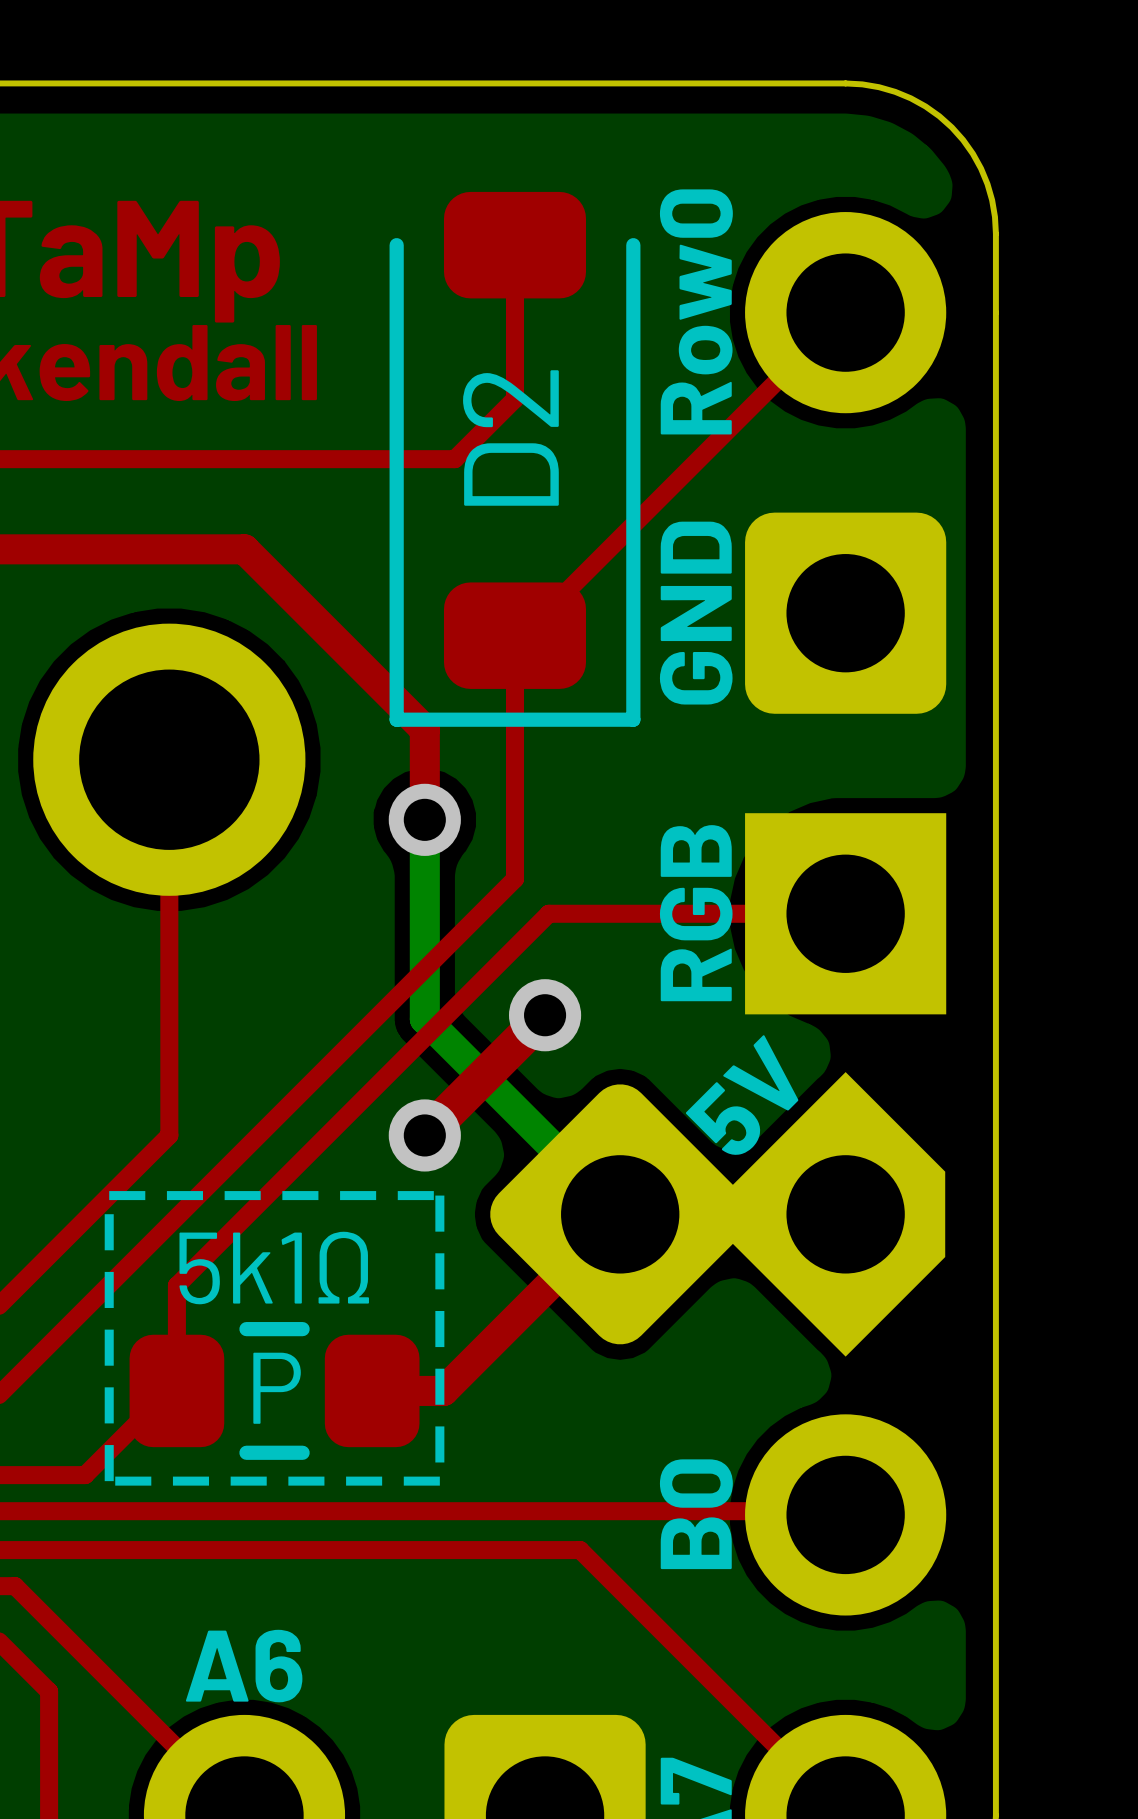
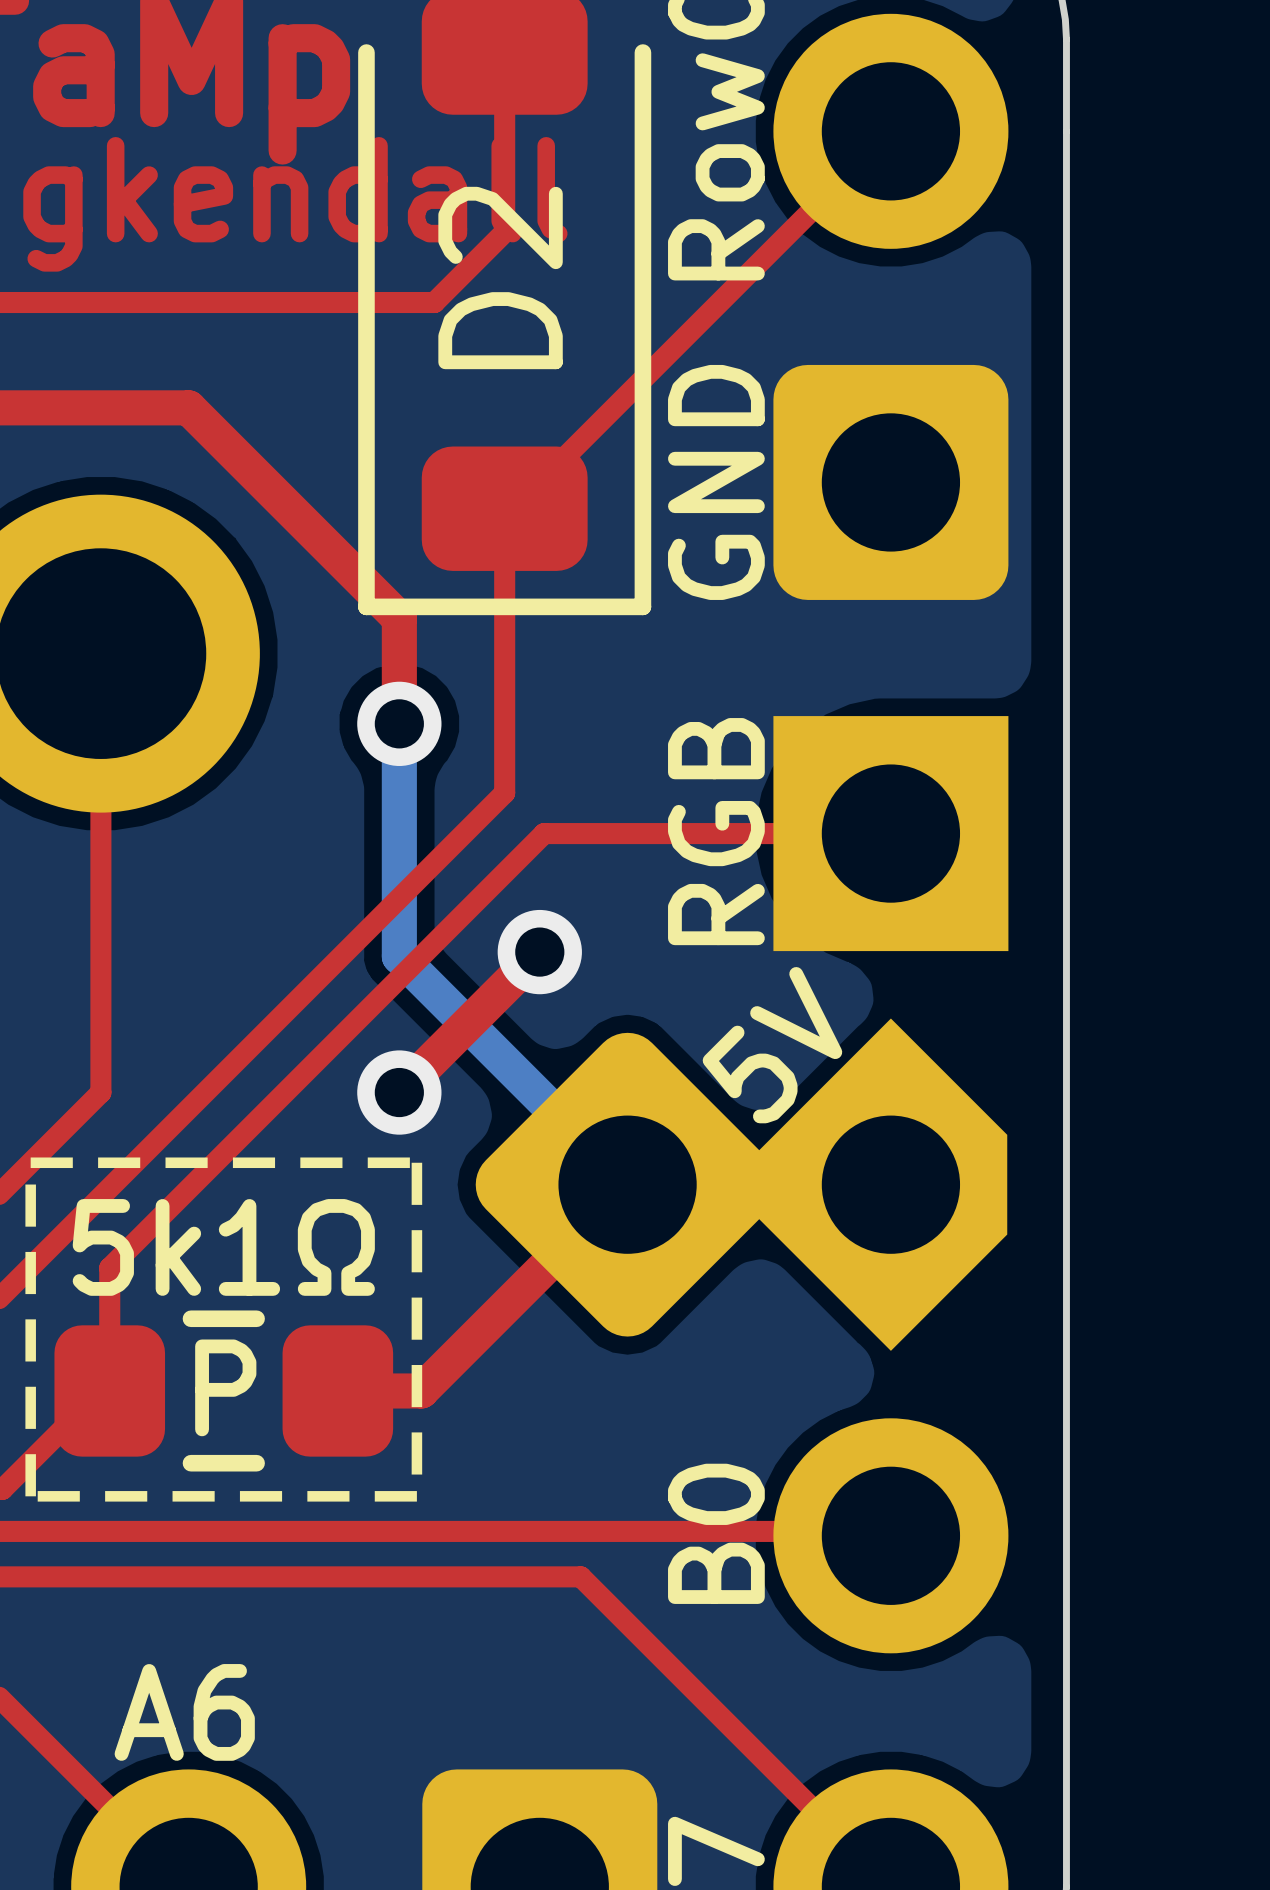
top track width: thick (545, 1015) (424, 1135) -> thin (539, 952) (399, 1092)

